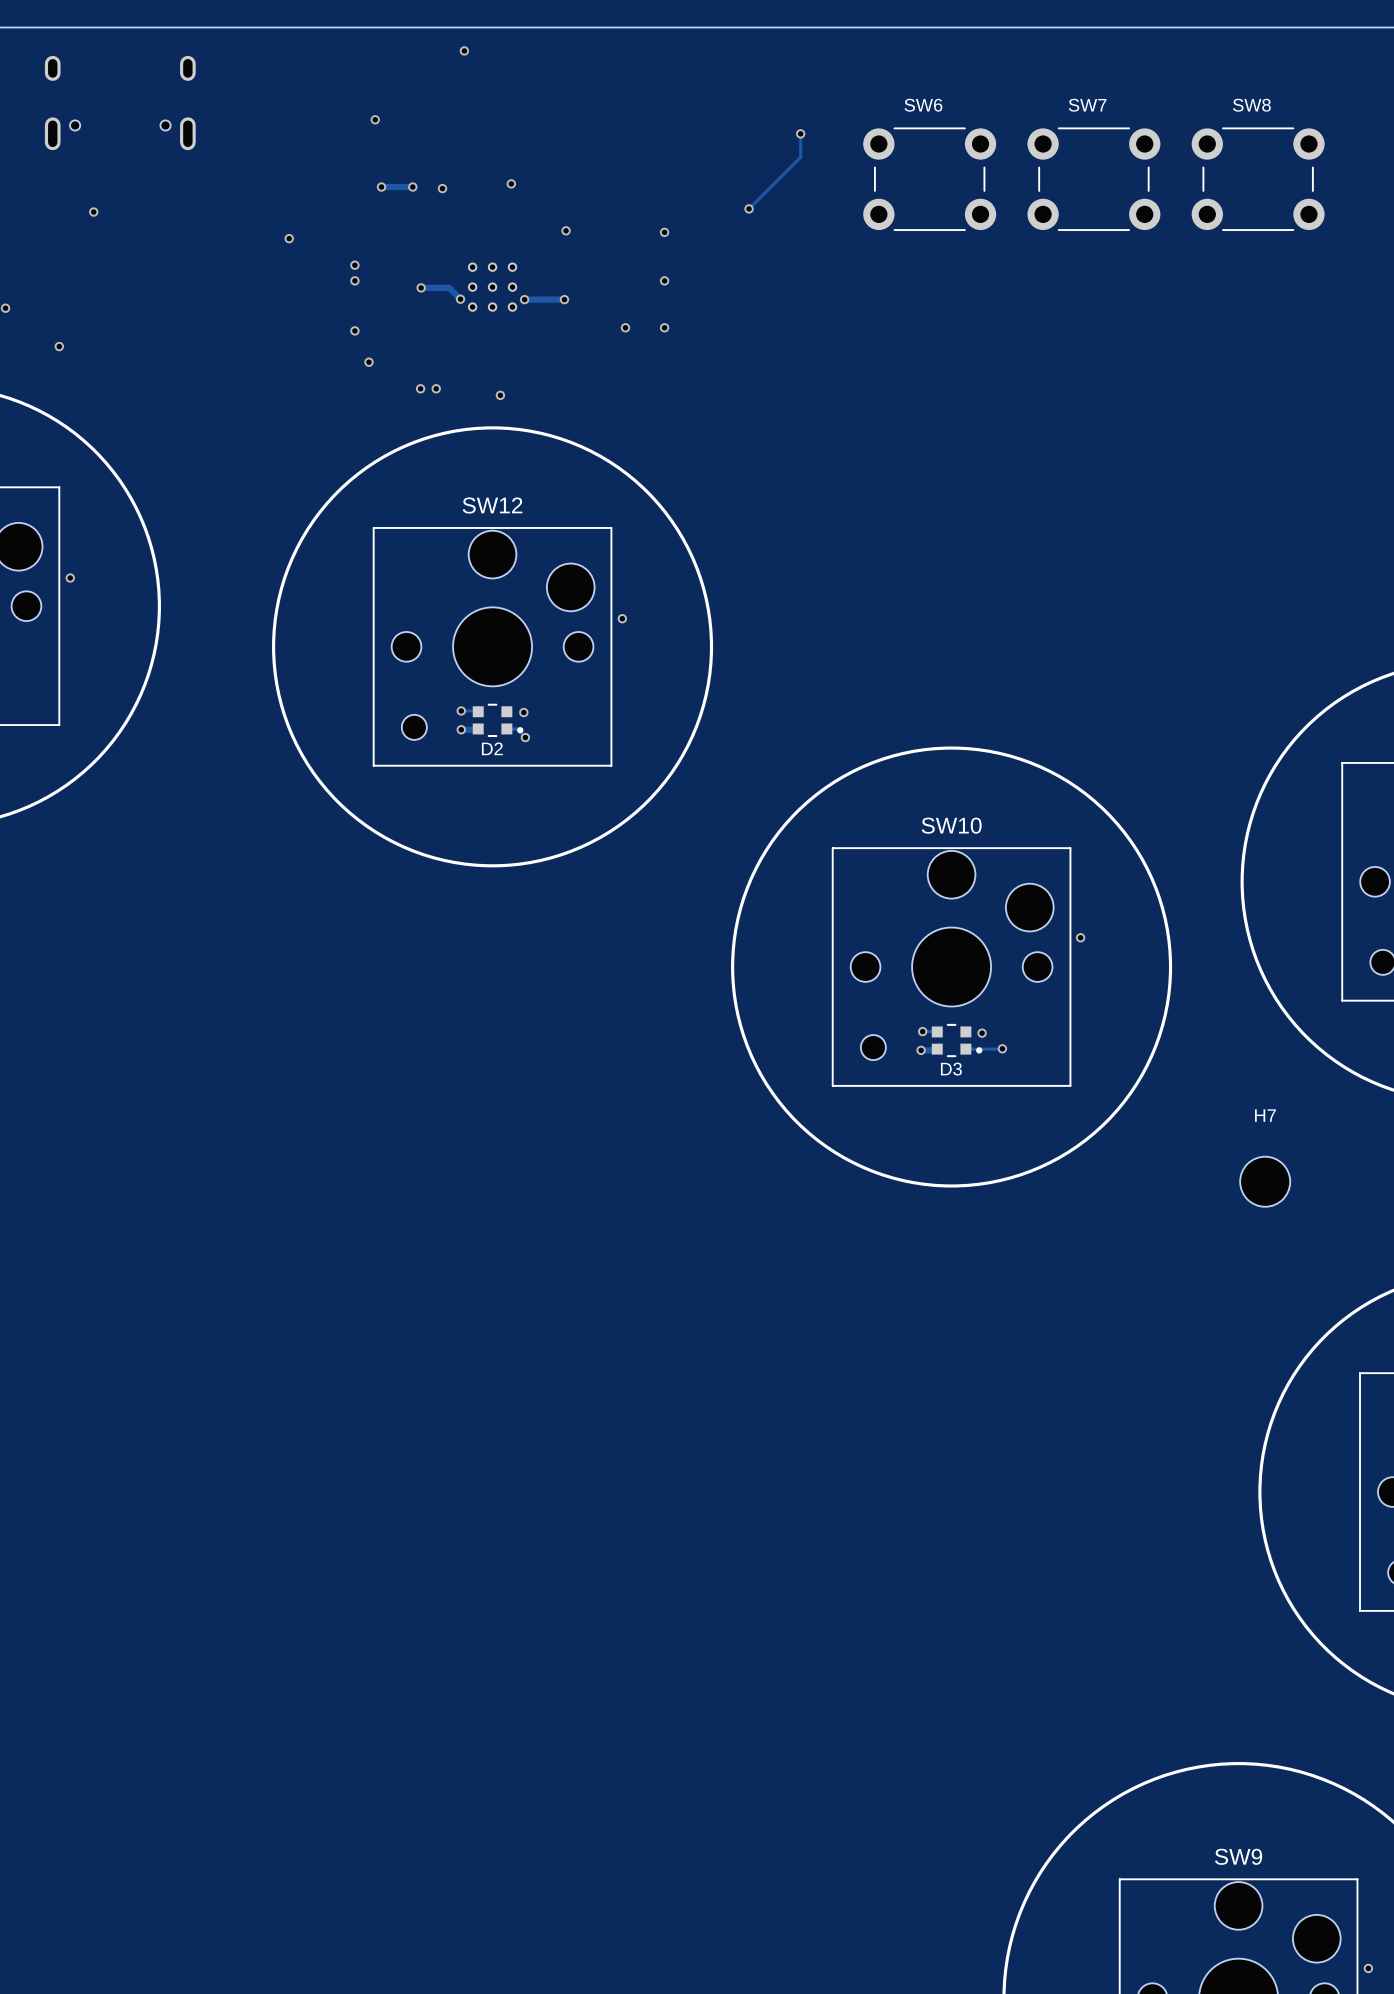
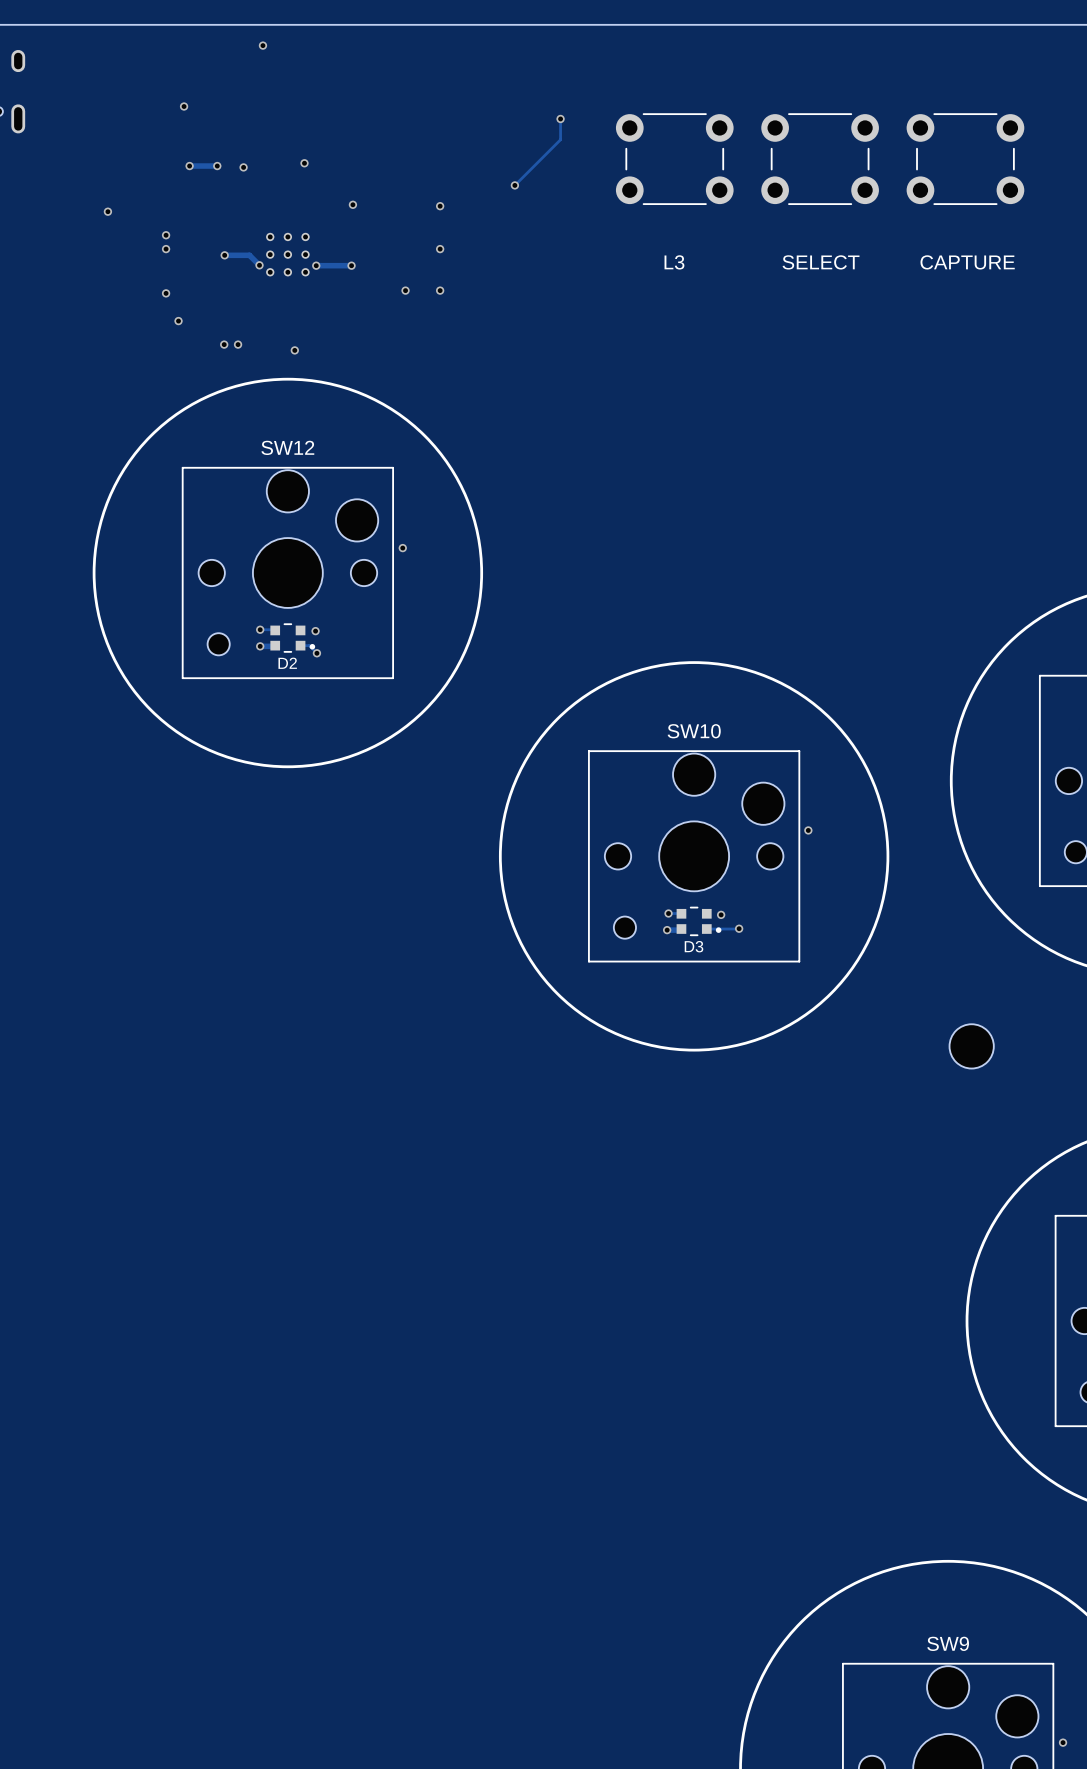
SW6 name: SW6 (923, 105) -> none
SW7 name: SW7 (1087, 105) -> none
SW8 name: SW8 (1251, 105) -> none
text: none -> L3 (674, 262)
text: none -> SELECT (821, 262)
text: none -> CAPTURE (967, 262)
H7 name: H7 (1265, 1115) -> none

